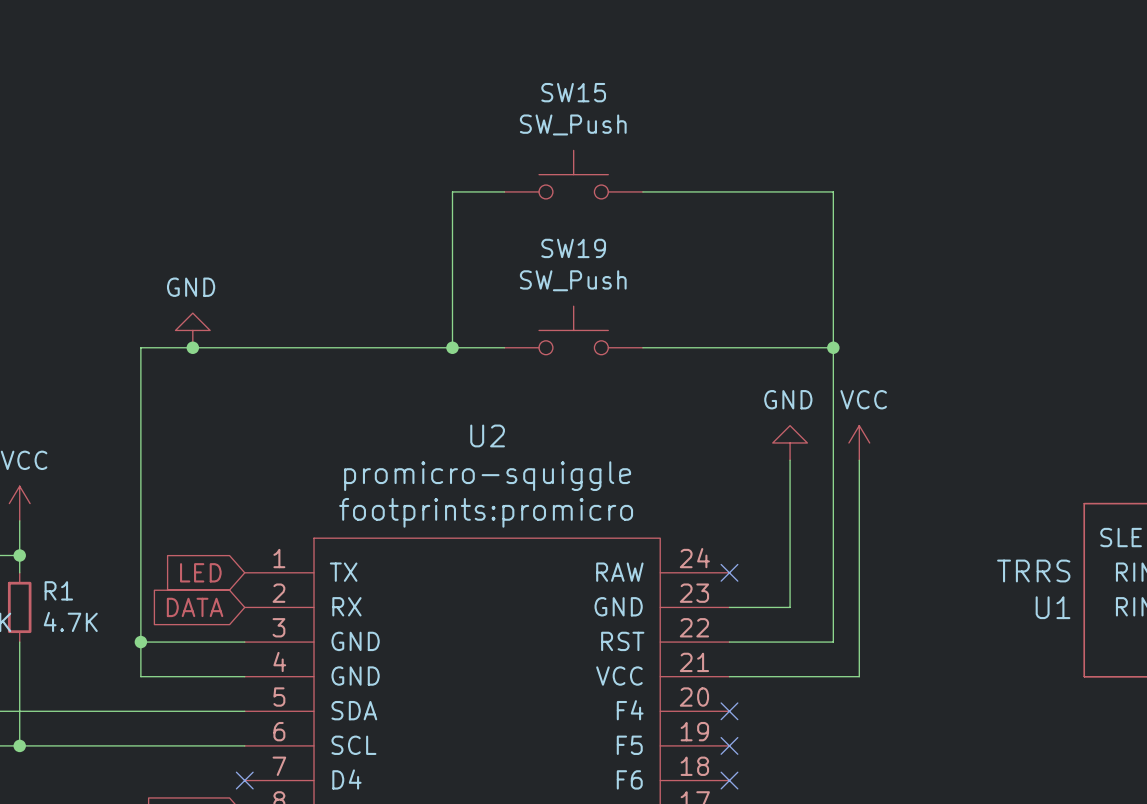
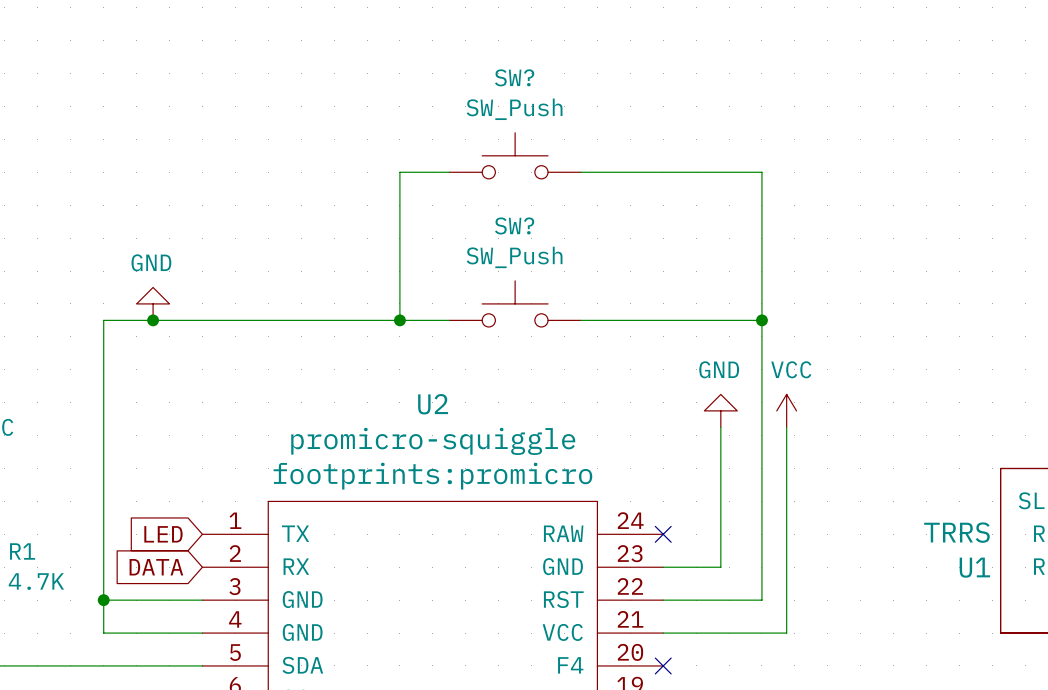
SW15 name: SW15 (573, 92) -> SW? (514, 77)
SW19 name: SW19 (573, 248) -> SW? (514, 225)

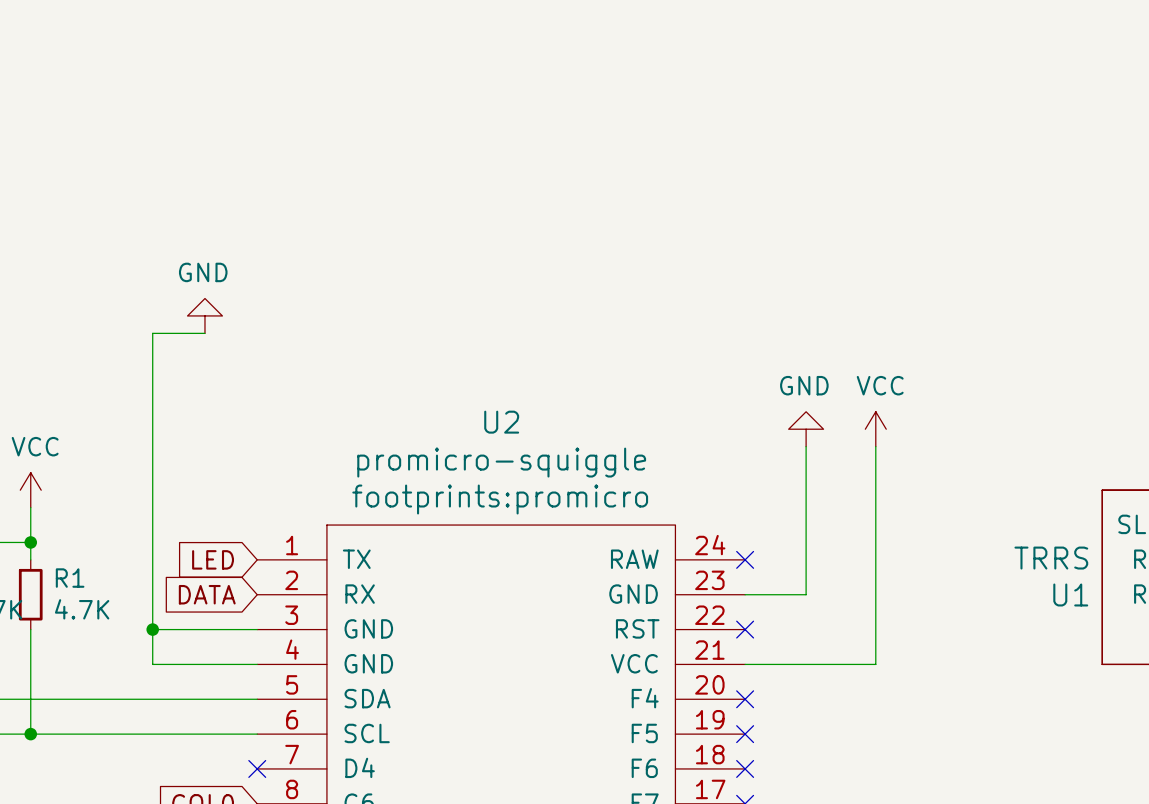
SW?: SW_Push (515, 155) -> none
wire: (449, 172) (399, 172) (399, 320) -> none
wire: (580, 172) (761, 172) (761, 600) (663, 600) -> none
SW?: SW_Push (515, 303) -> none
wire: (153, 320) (449, 320) -> none
junction: (153, 320) -> none
junction: (399, 320) -> none
wire: (580, 320) (761, 320) -> none
junction: (761, 320) -> none
no-connect mark: none -> (745, 629)

